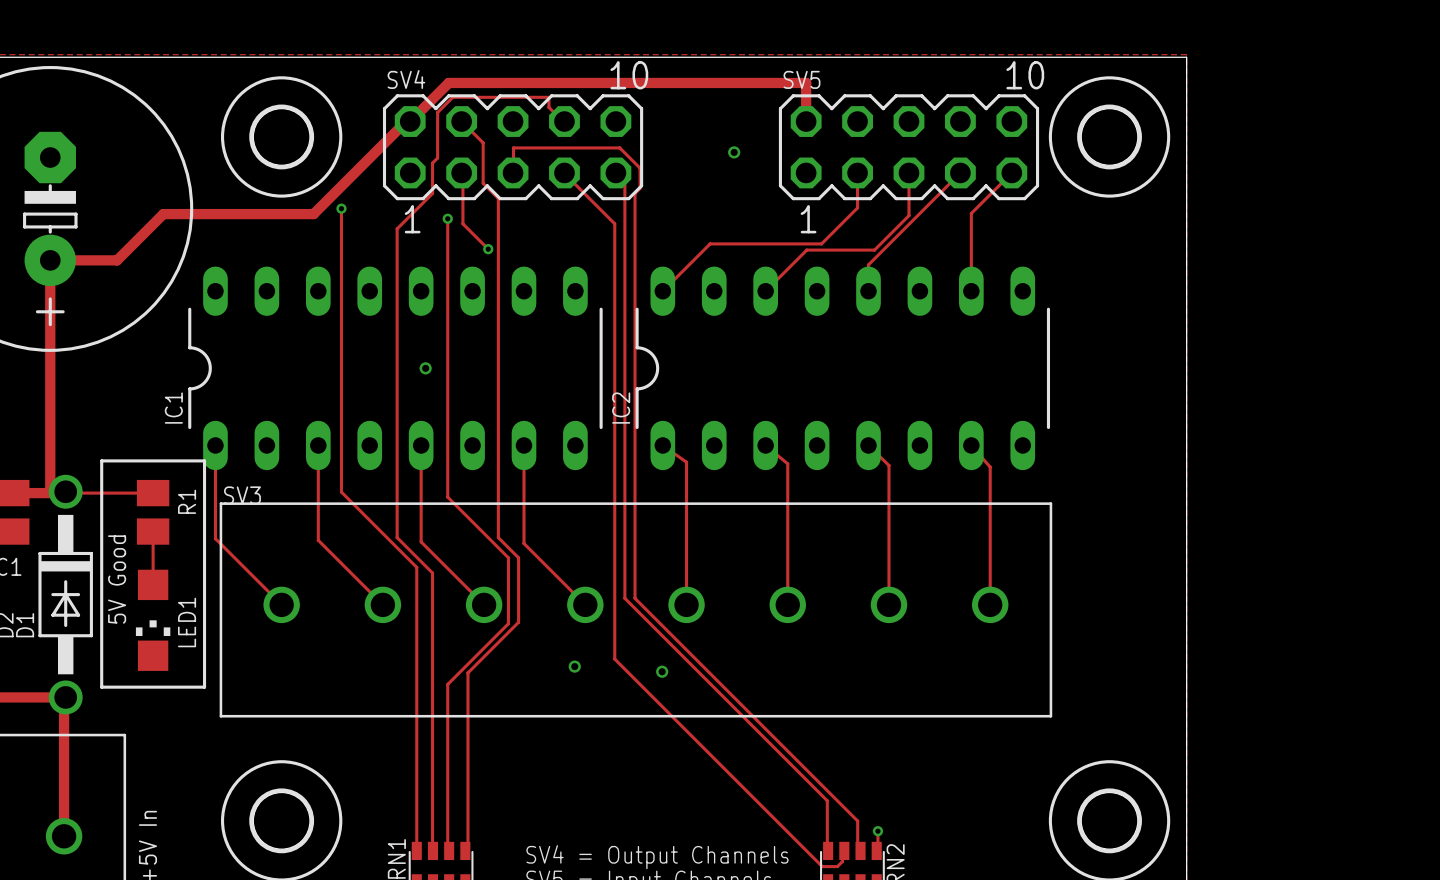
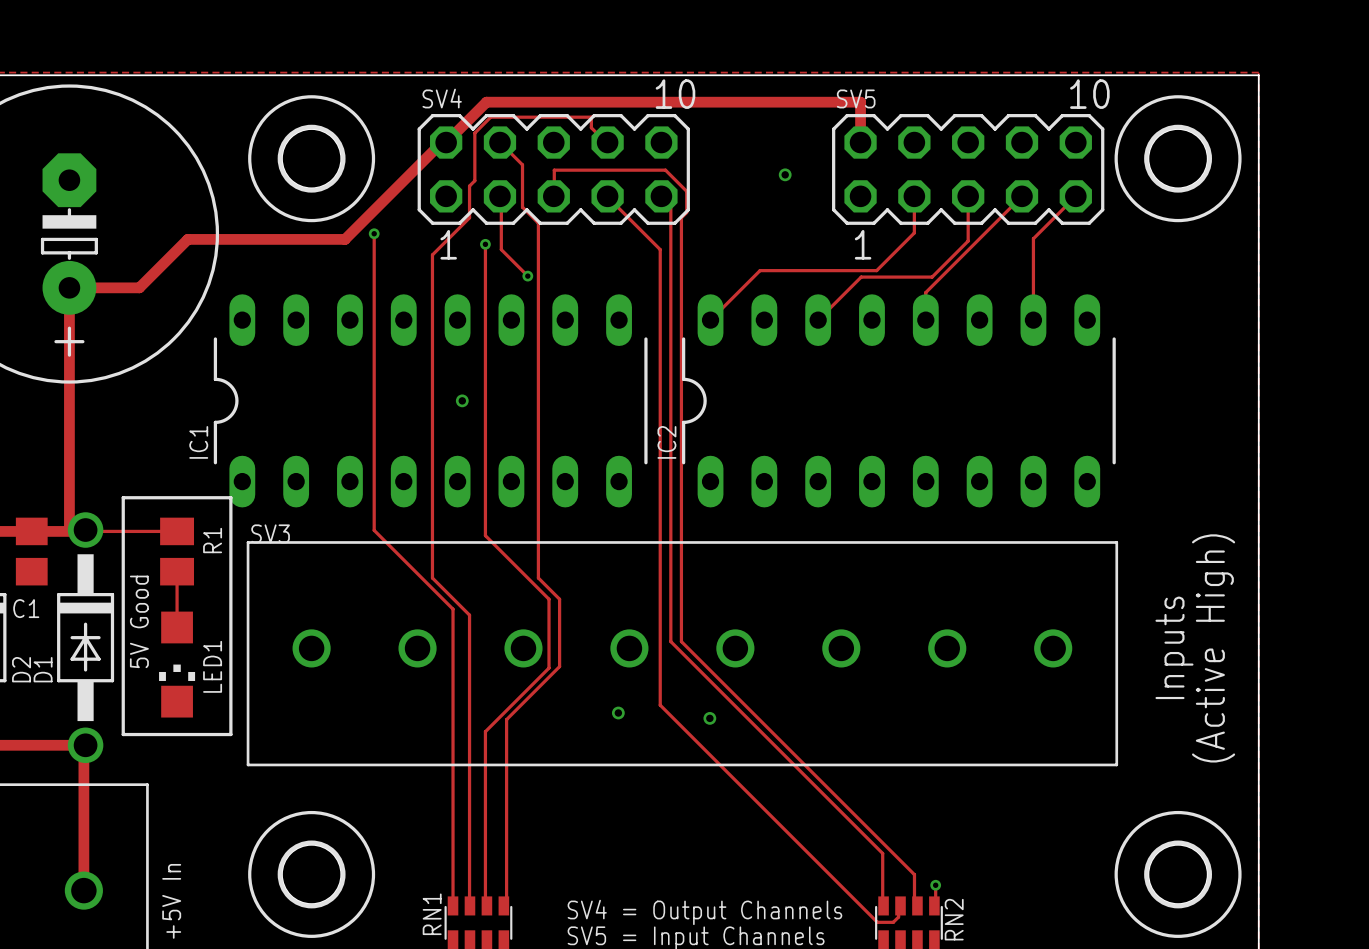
track: (215, 445) (215, 538) (281, 604) -> none
track: (318, 445) (318, 540) (382, 604) -> none
track: (421, 445) (421, 541) (484, 604) -> none
track: (523, 445) (523, 543) (585, 604) -> none
track: (662, 445) (686, 462) (686, 604) -> none
track: (765, 445) (787, 463) (787, 604) -> none
track: (868, 445) (888, 465) (888, 604) -> none
track: (971, 445) (990, 467) (990, 604) -> none
text: none -> Inputs (1174, 647)
text: none -> (Active High) (1213, 648)

